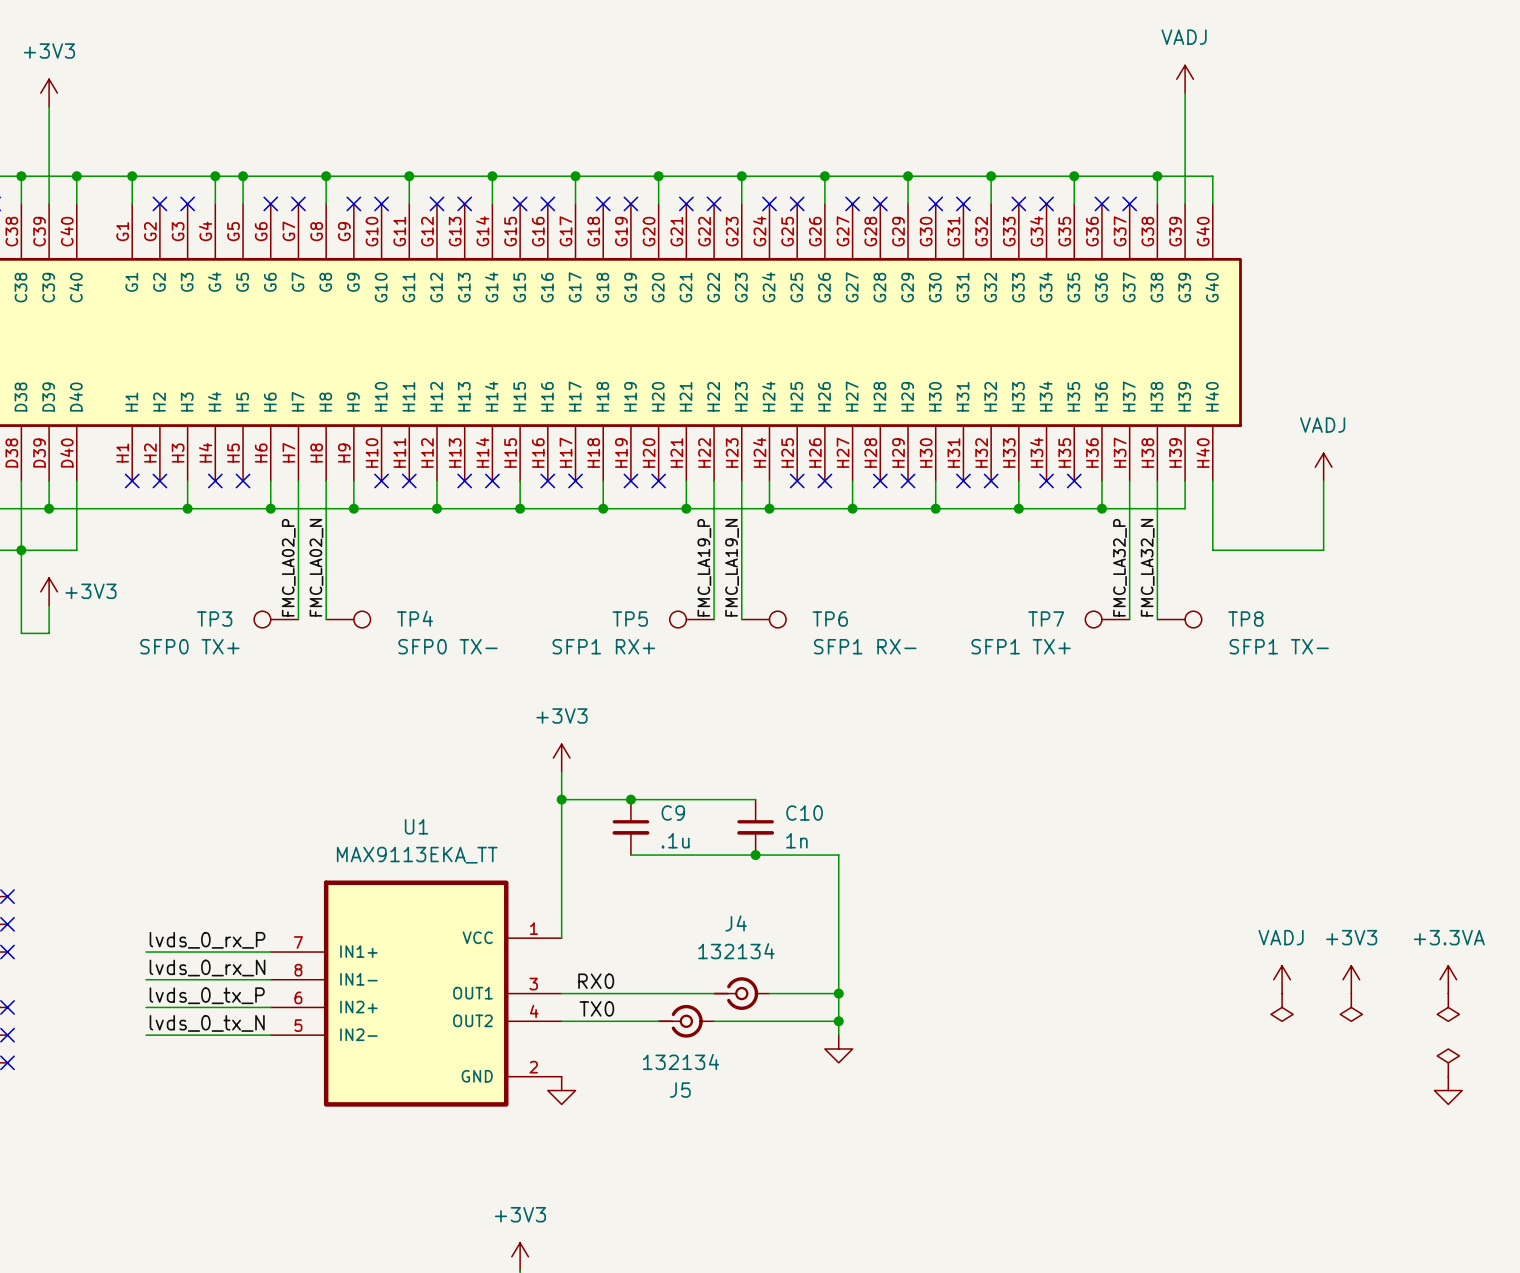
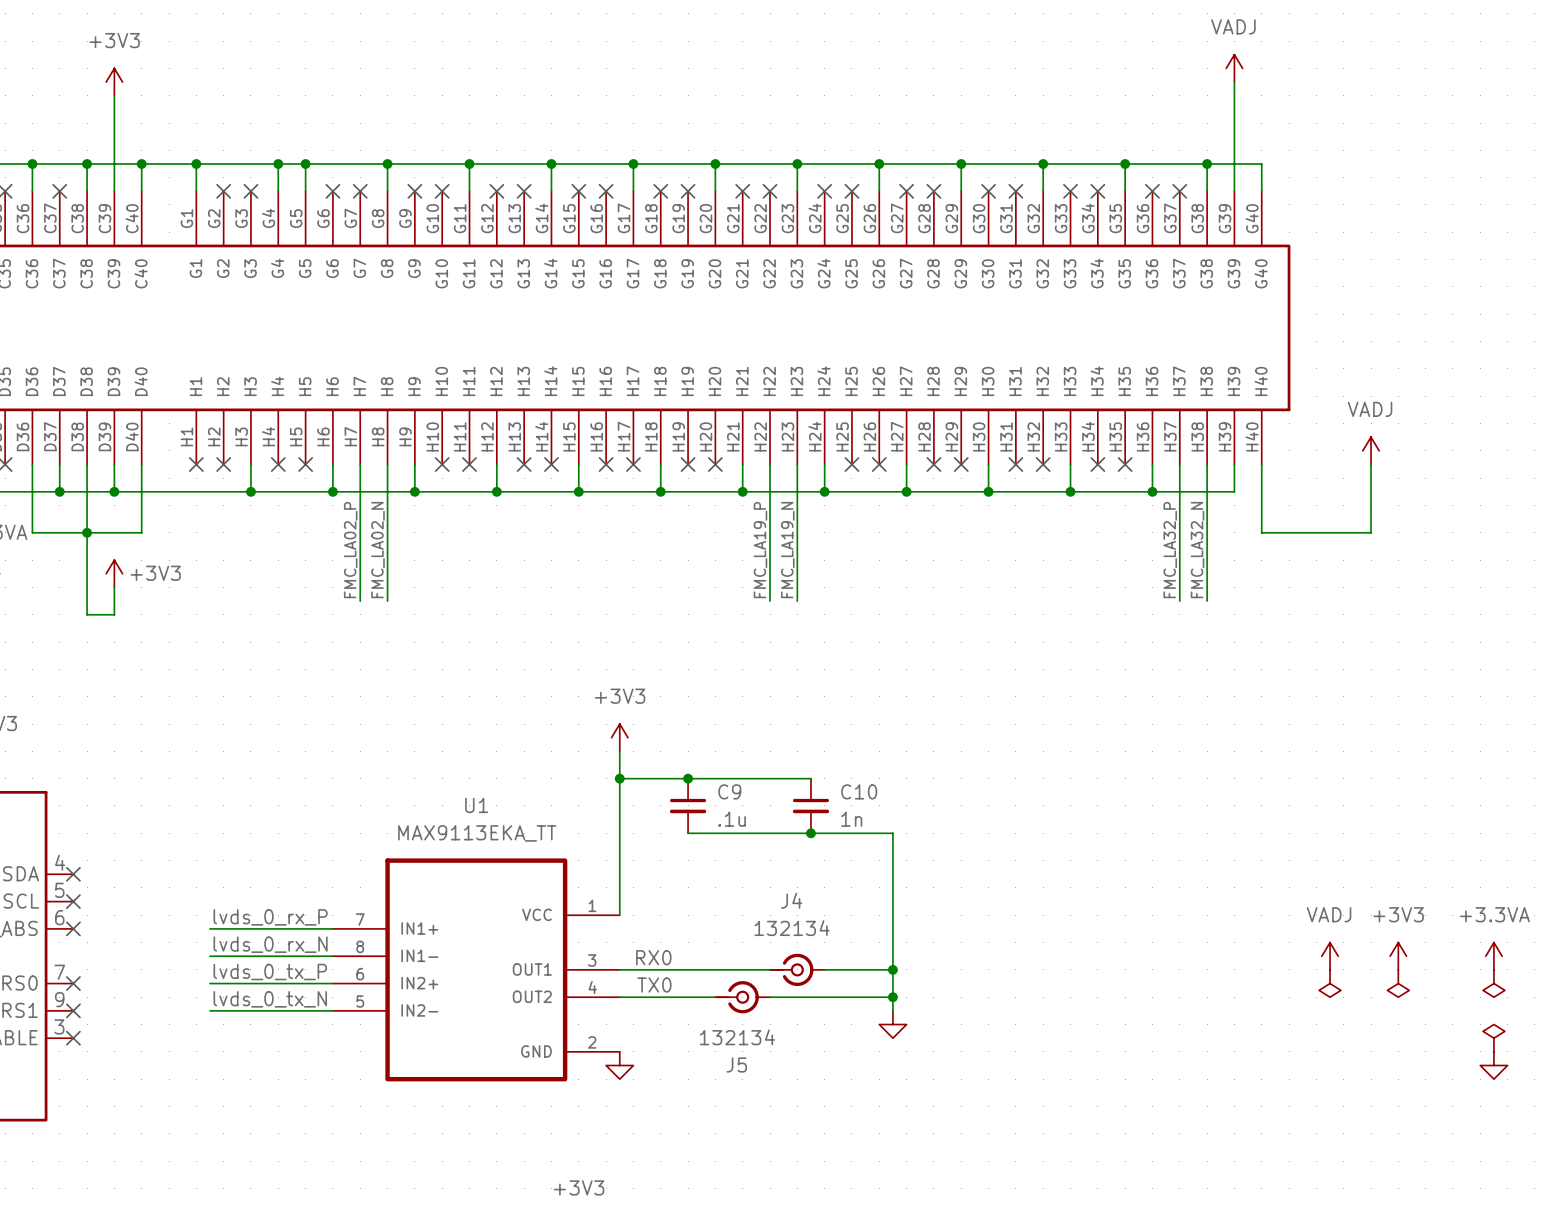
TP3: SFP0 TX+ (276, 619) -> none
TP4: SFP0 TX- (348, 619) -> none
TP5: SFP1 RX+ (691, 619) -> none
TP6: SFP1 RX- (763, 619) -> none
TP7: SFP1 TX+ (1107, 619) -> none
TP8: SFP1 TX- (1179, 619) -> none

